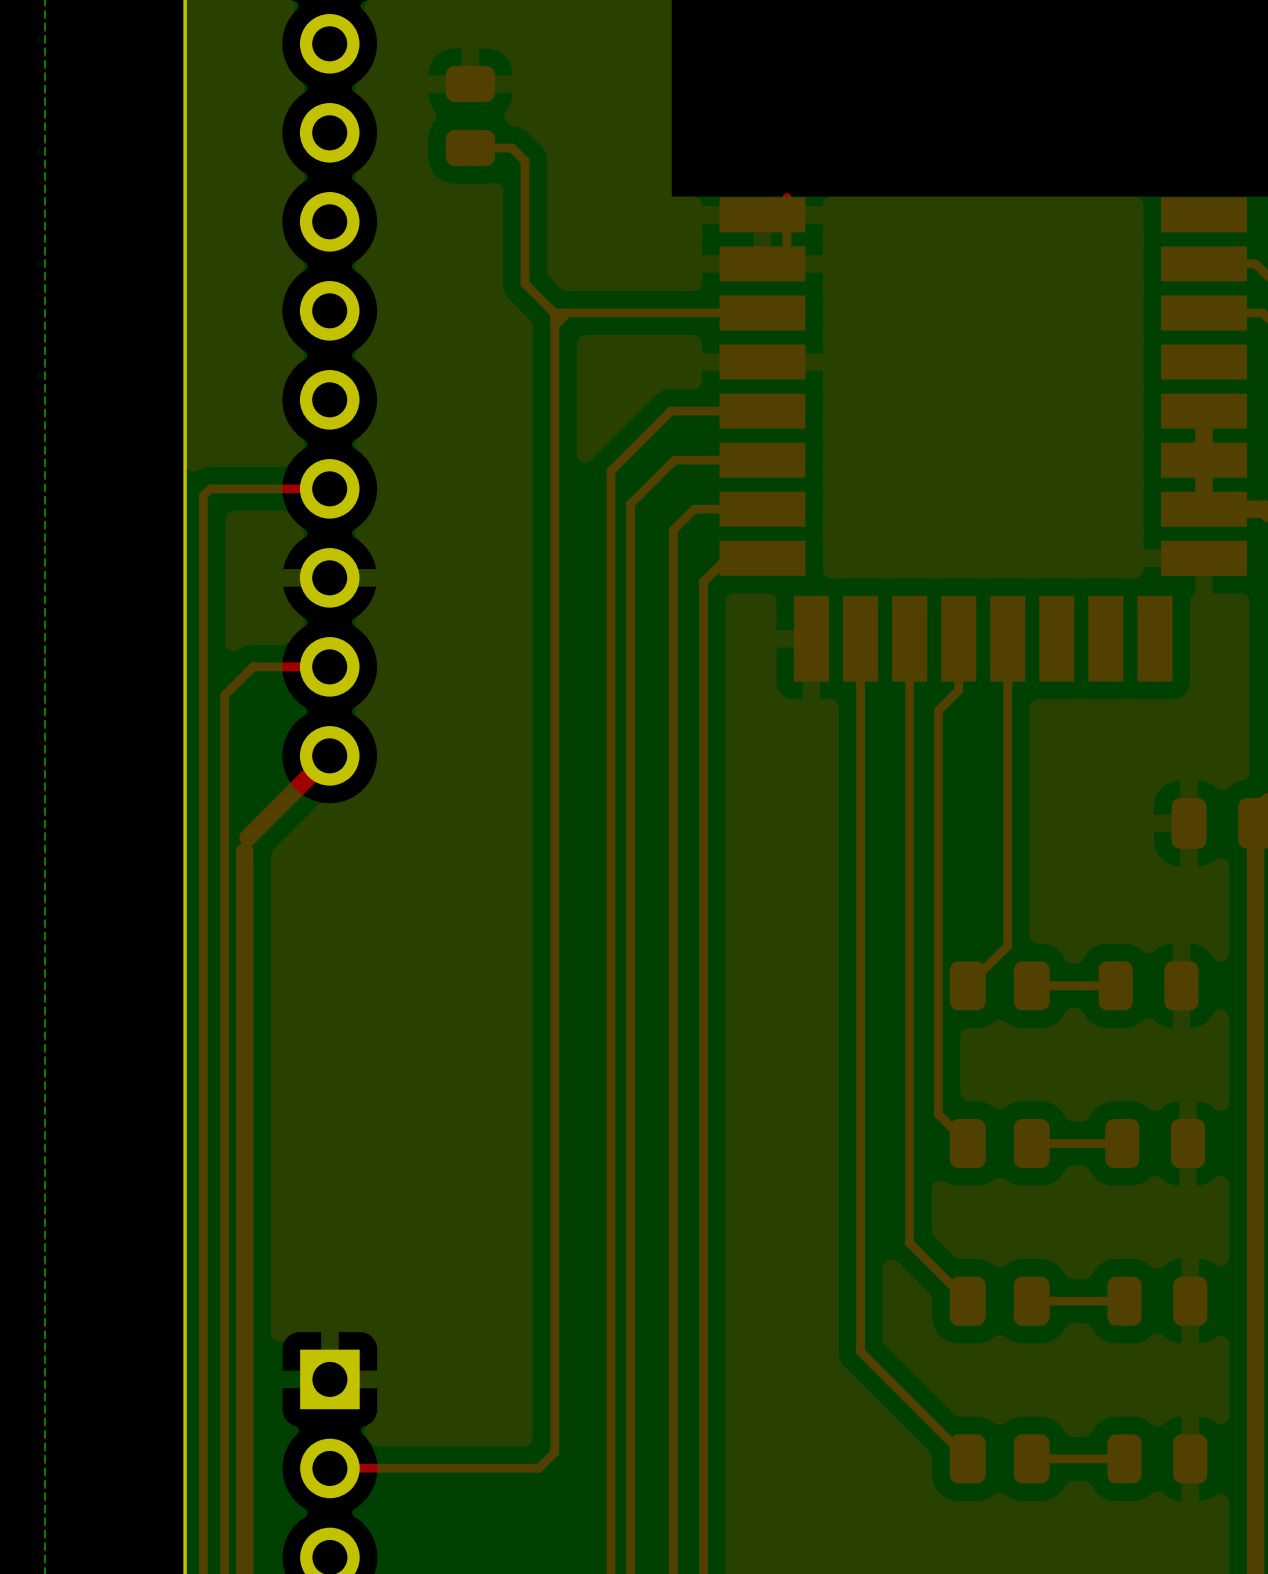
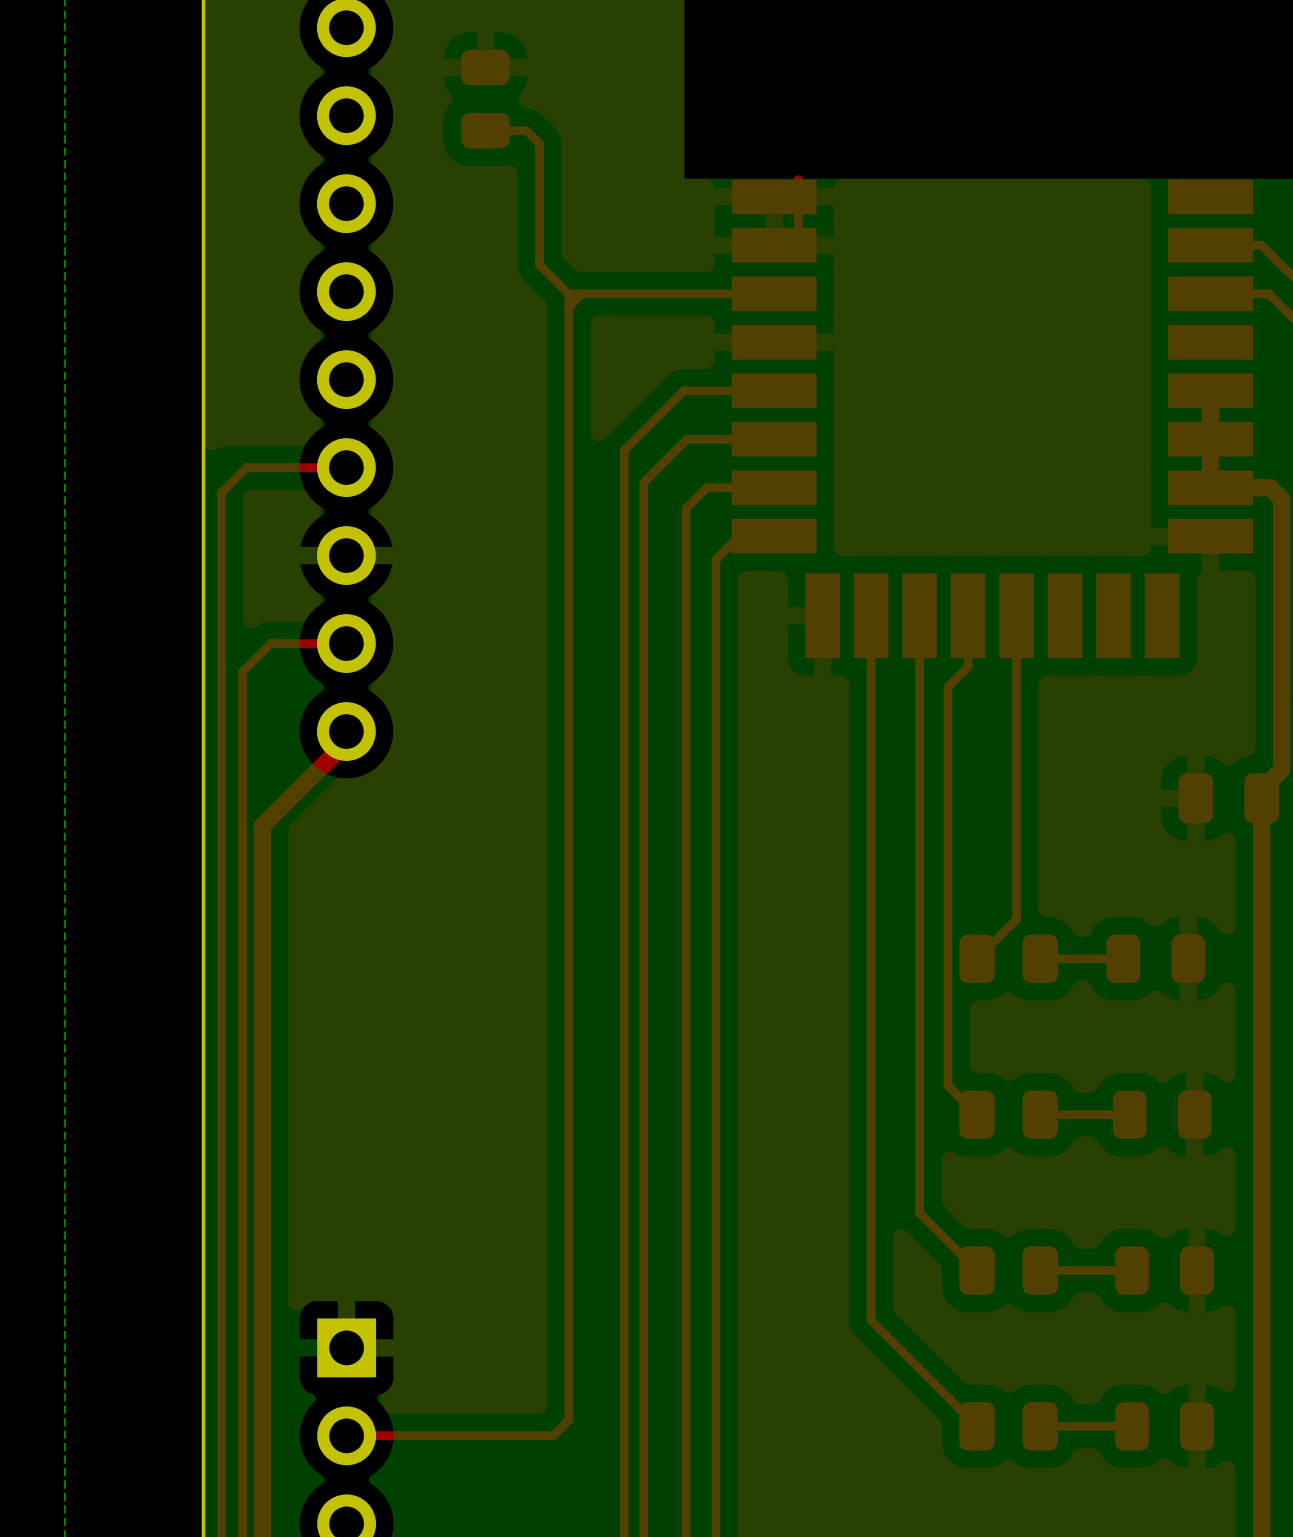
top track: (228, 488) (210, 488) (203, 495) (203, 514) -> (246, 467) (221, 492)
top track: (329, 755) (248, 837) -> (342, 745) (262, 825)

